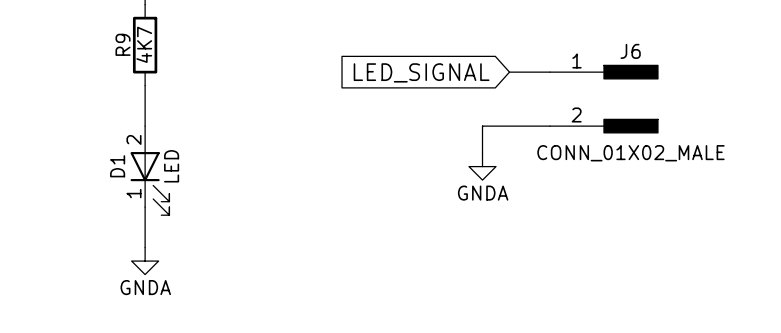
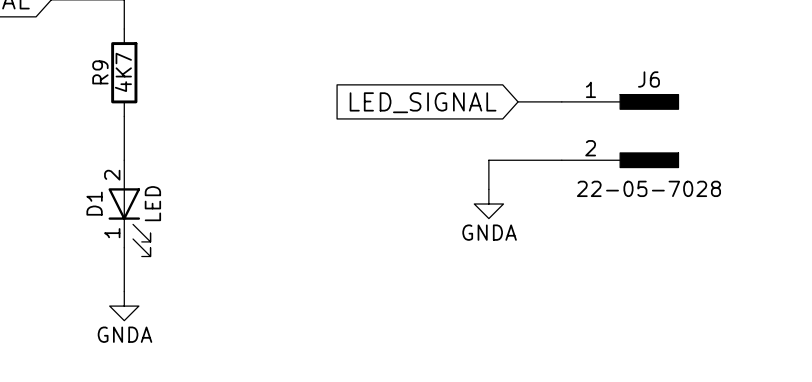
J6 value: CONN_01X02_MALE (630, 153) -> 22-05-7028 (648, 188)

